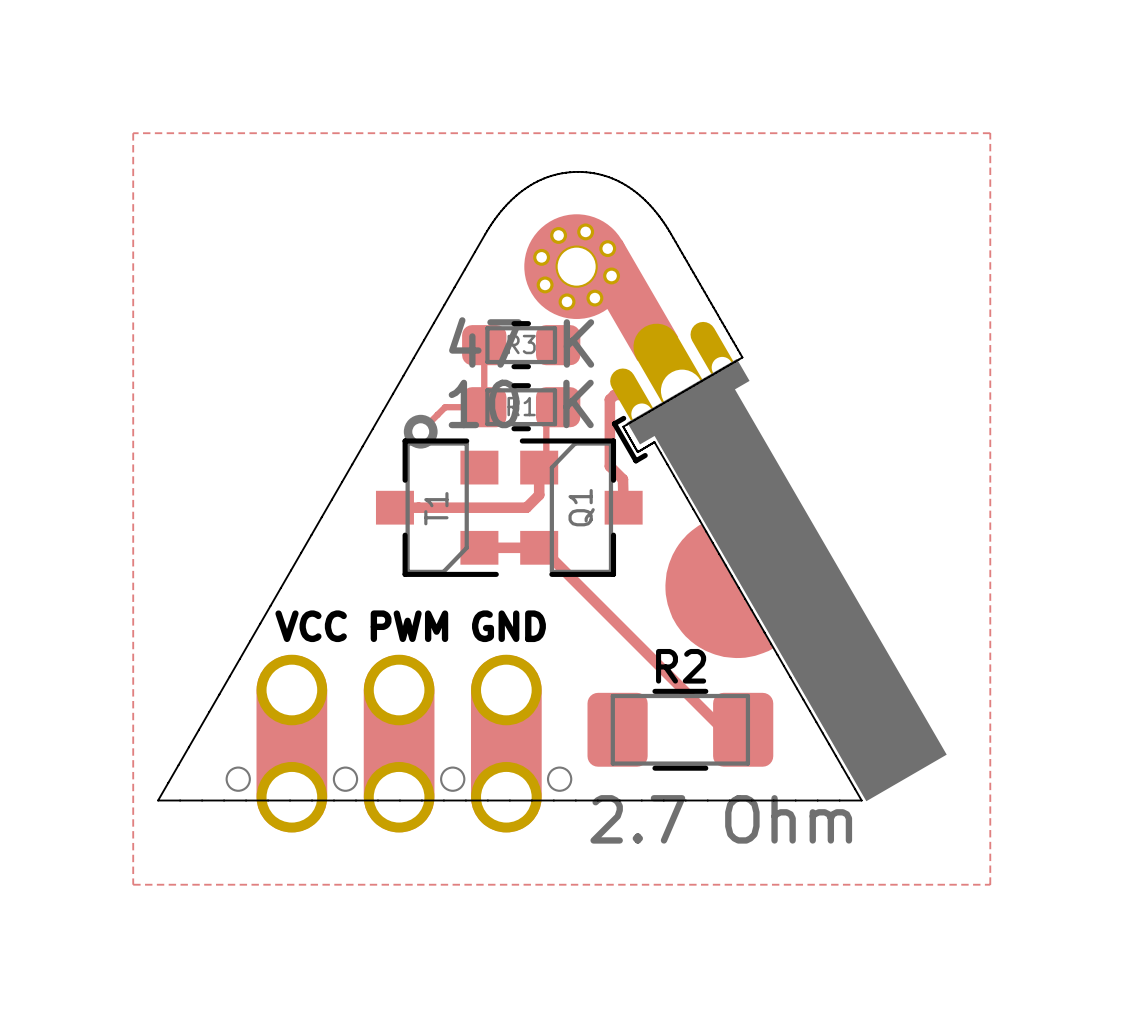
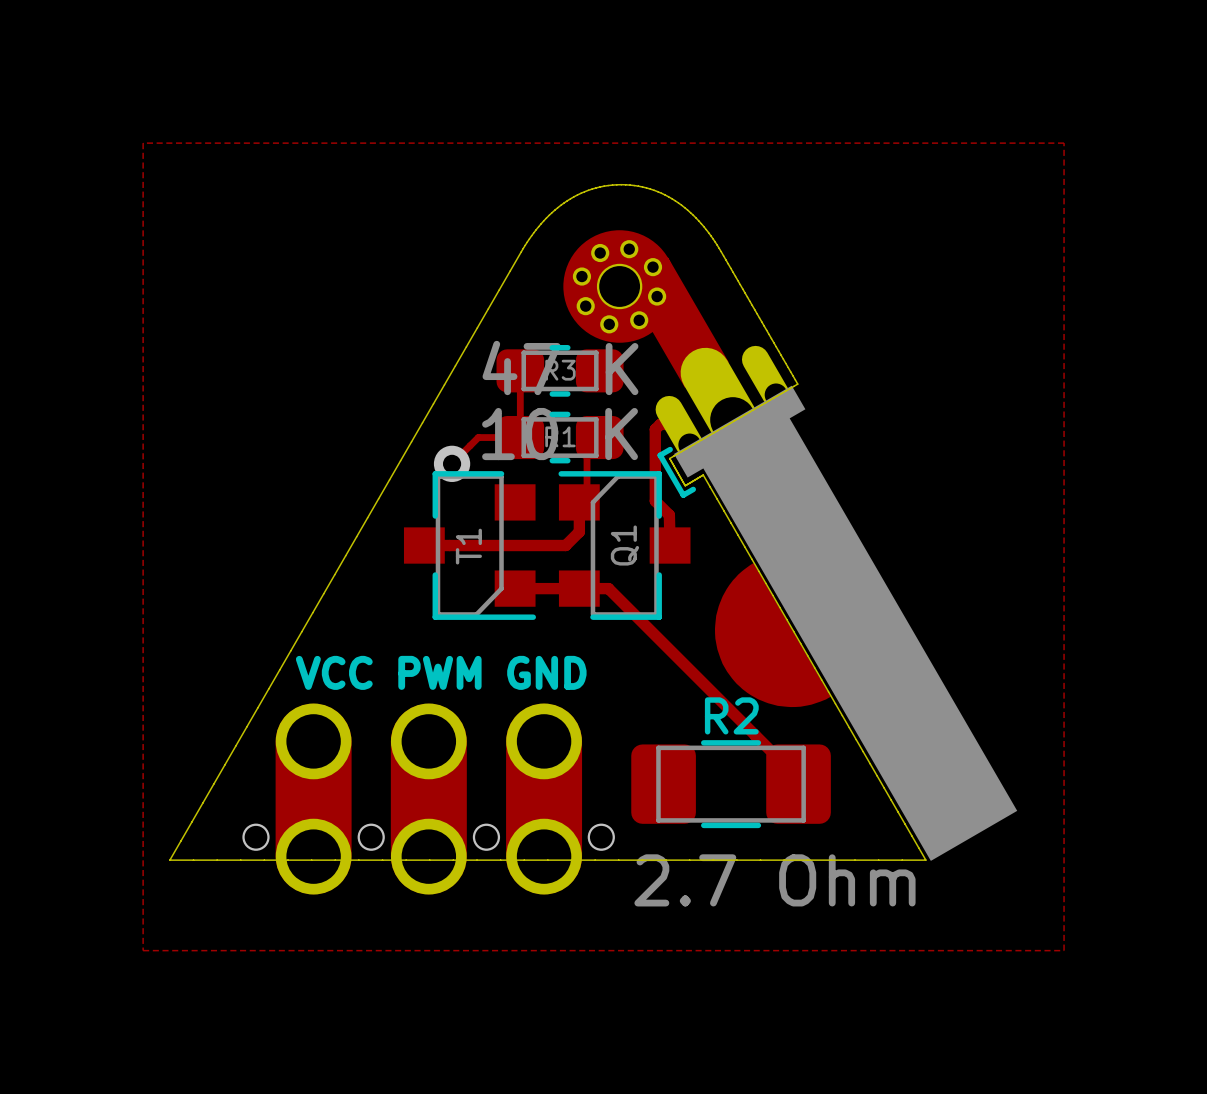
track: (541, 547) (723, 729) (743, 729) -> (581, 588) (608, 588) (818, 799)

